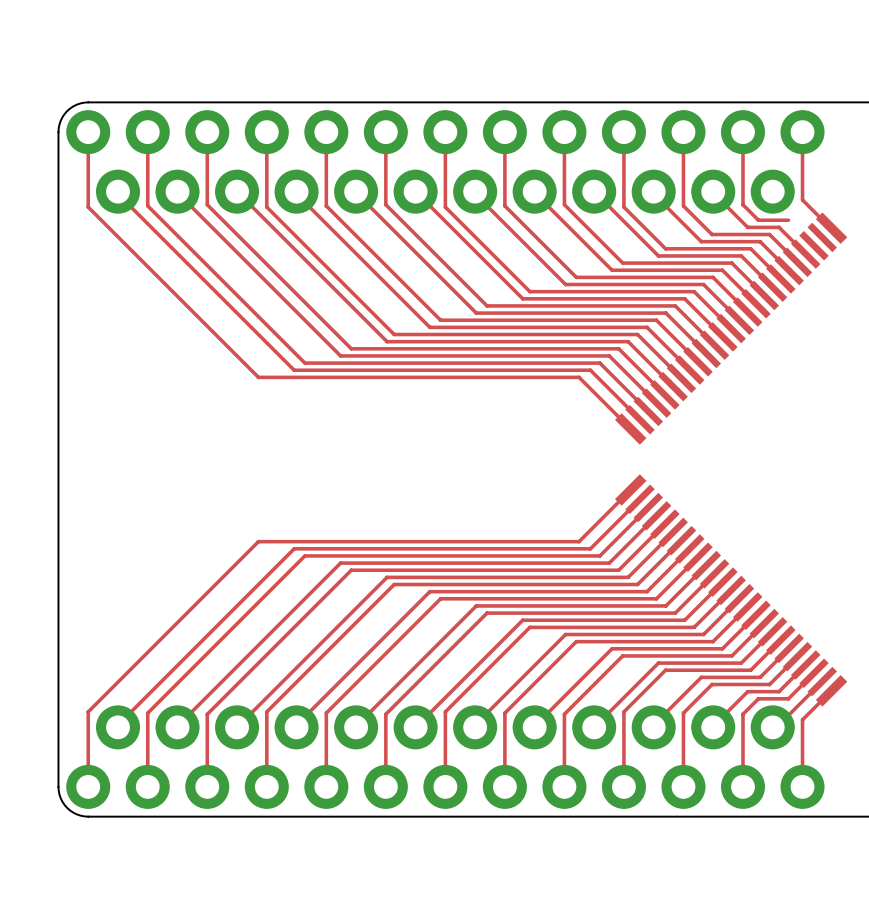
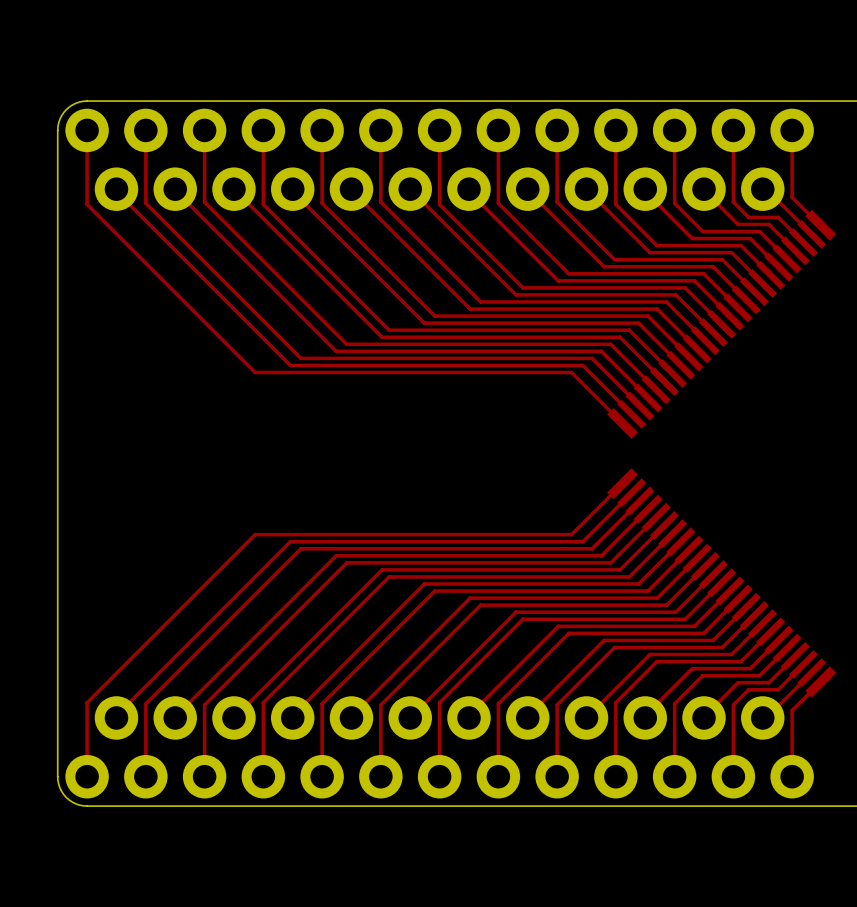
top track: none -> (766, 189) (811, 234)
top track: none -> (778, 217) (803, 242)

